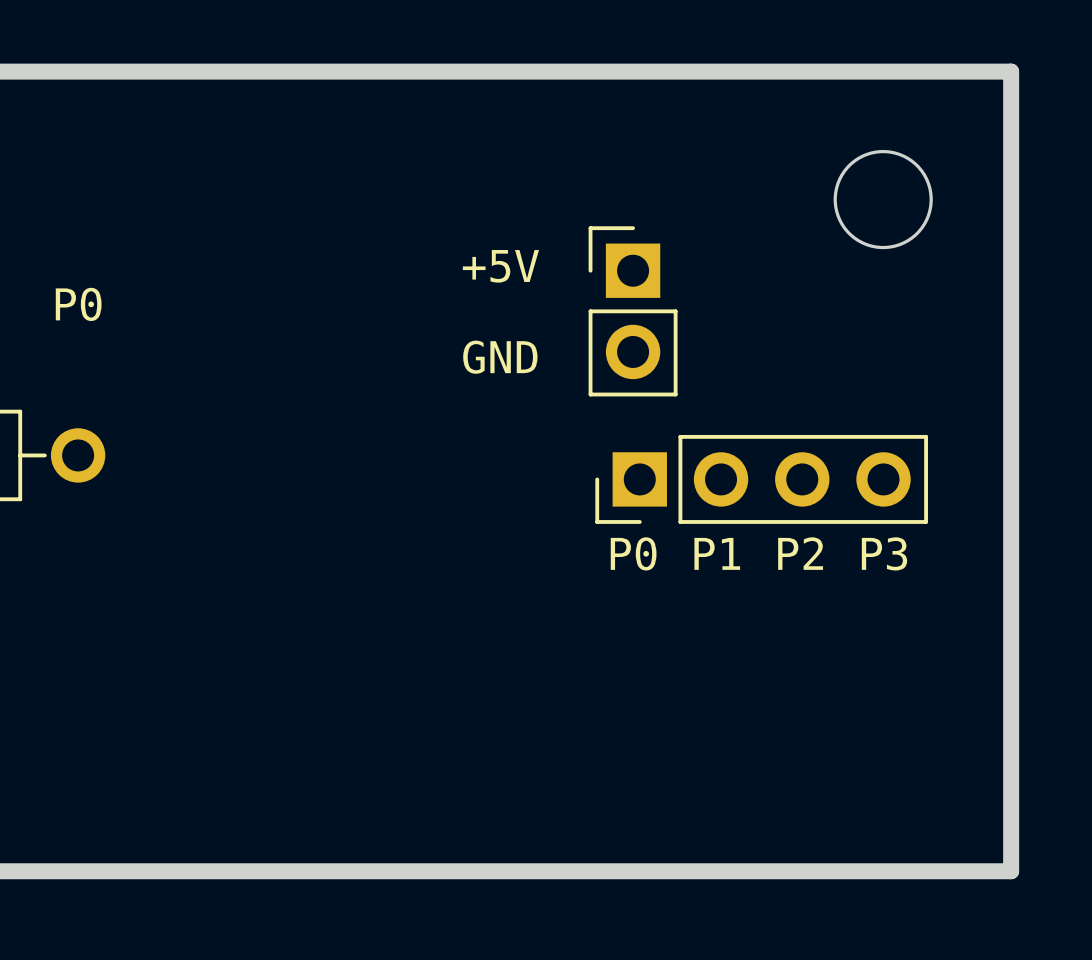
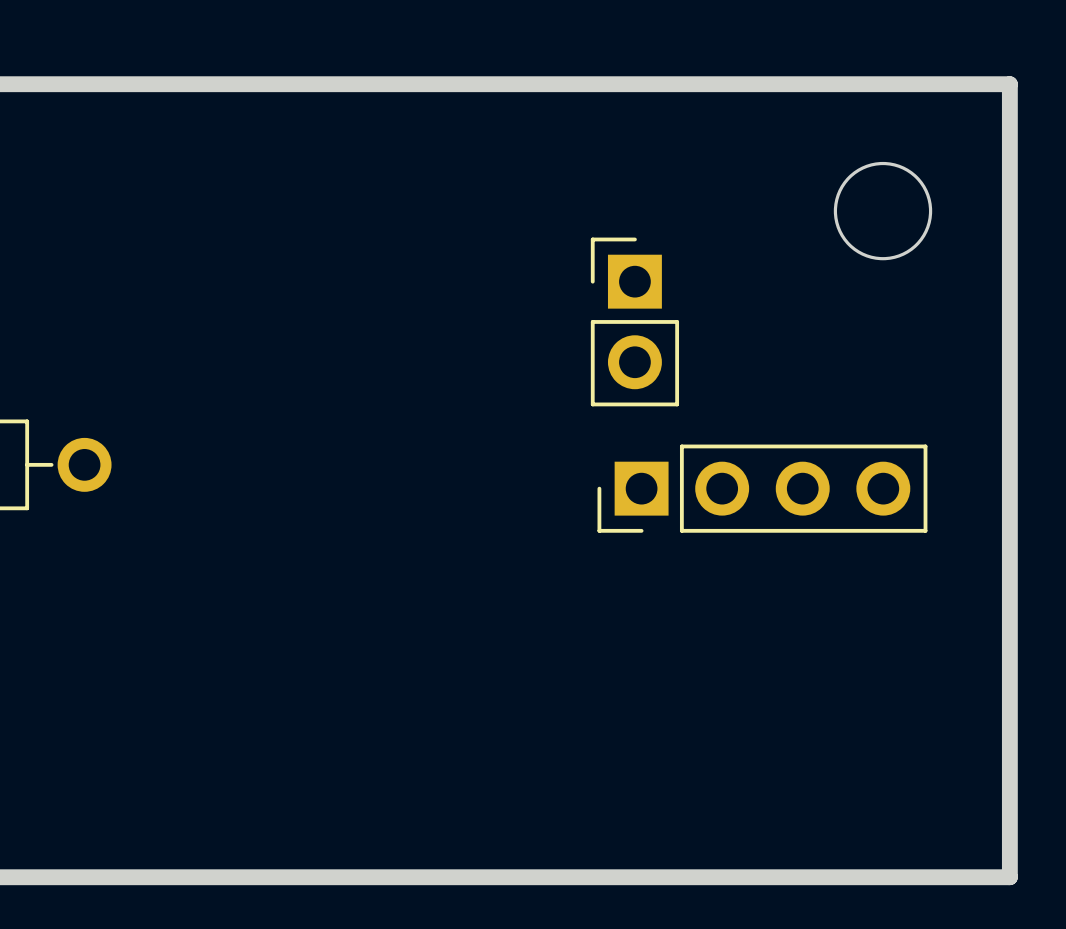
text: +5V (500, 266) -> none
text: P0 (78, 304) -> none
text: GND (500, 357) -> none
text: P0 (633, 553) -> none
text: P1 (717, 553) -> none
text: P2 (800, 553) -> none
text: P3 (884, 553) -> none

